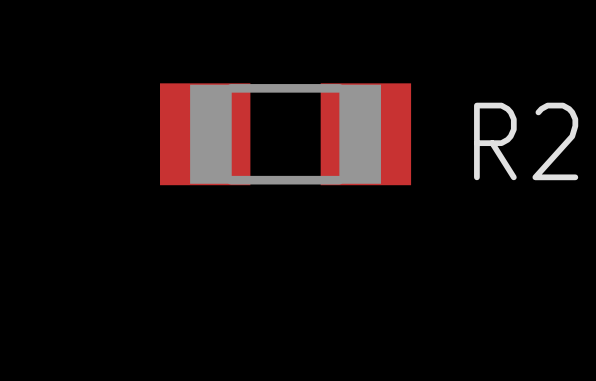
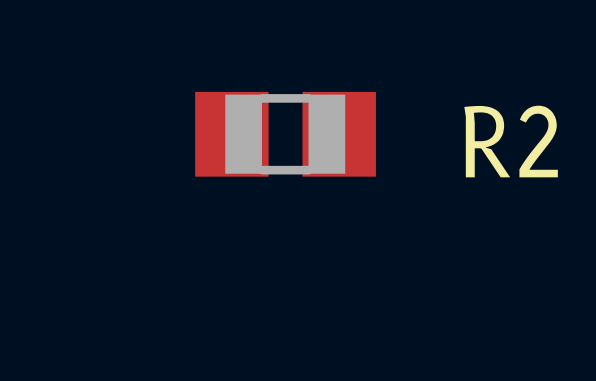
R2 footprint: [159, 83, 412, 186] -> [195, 91, 376, 177]

